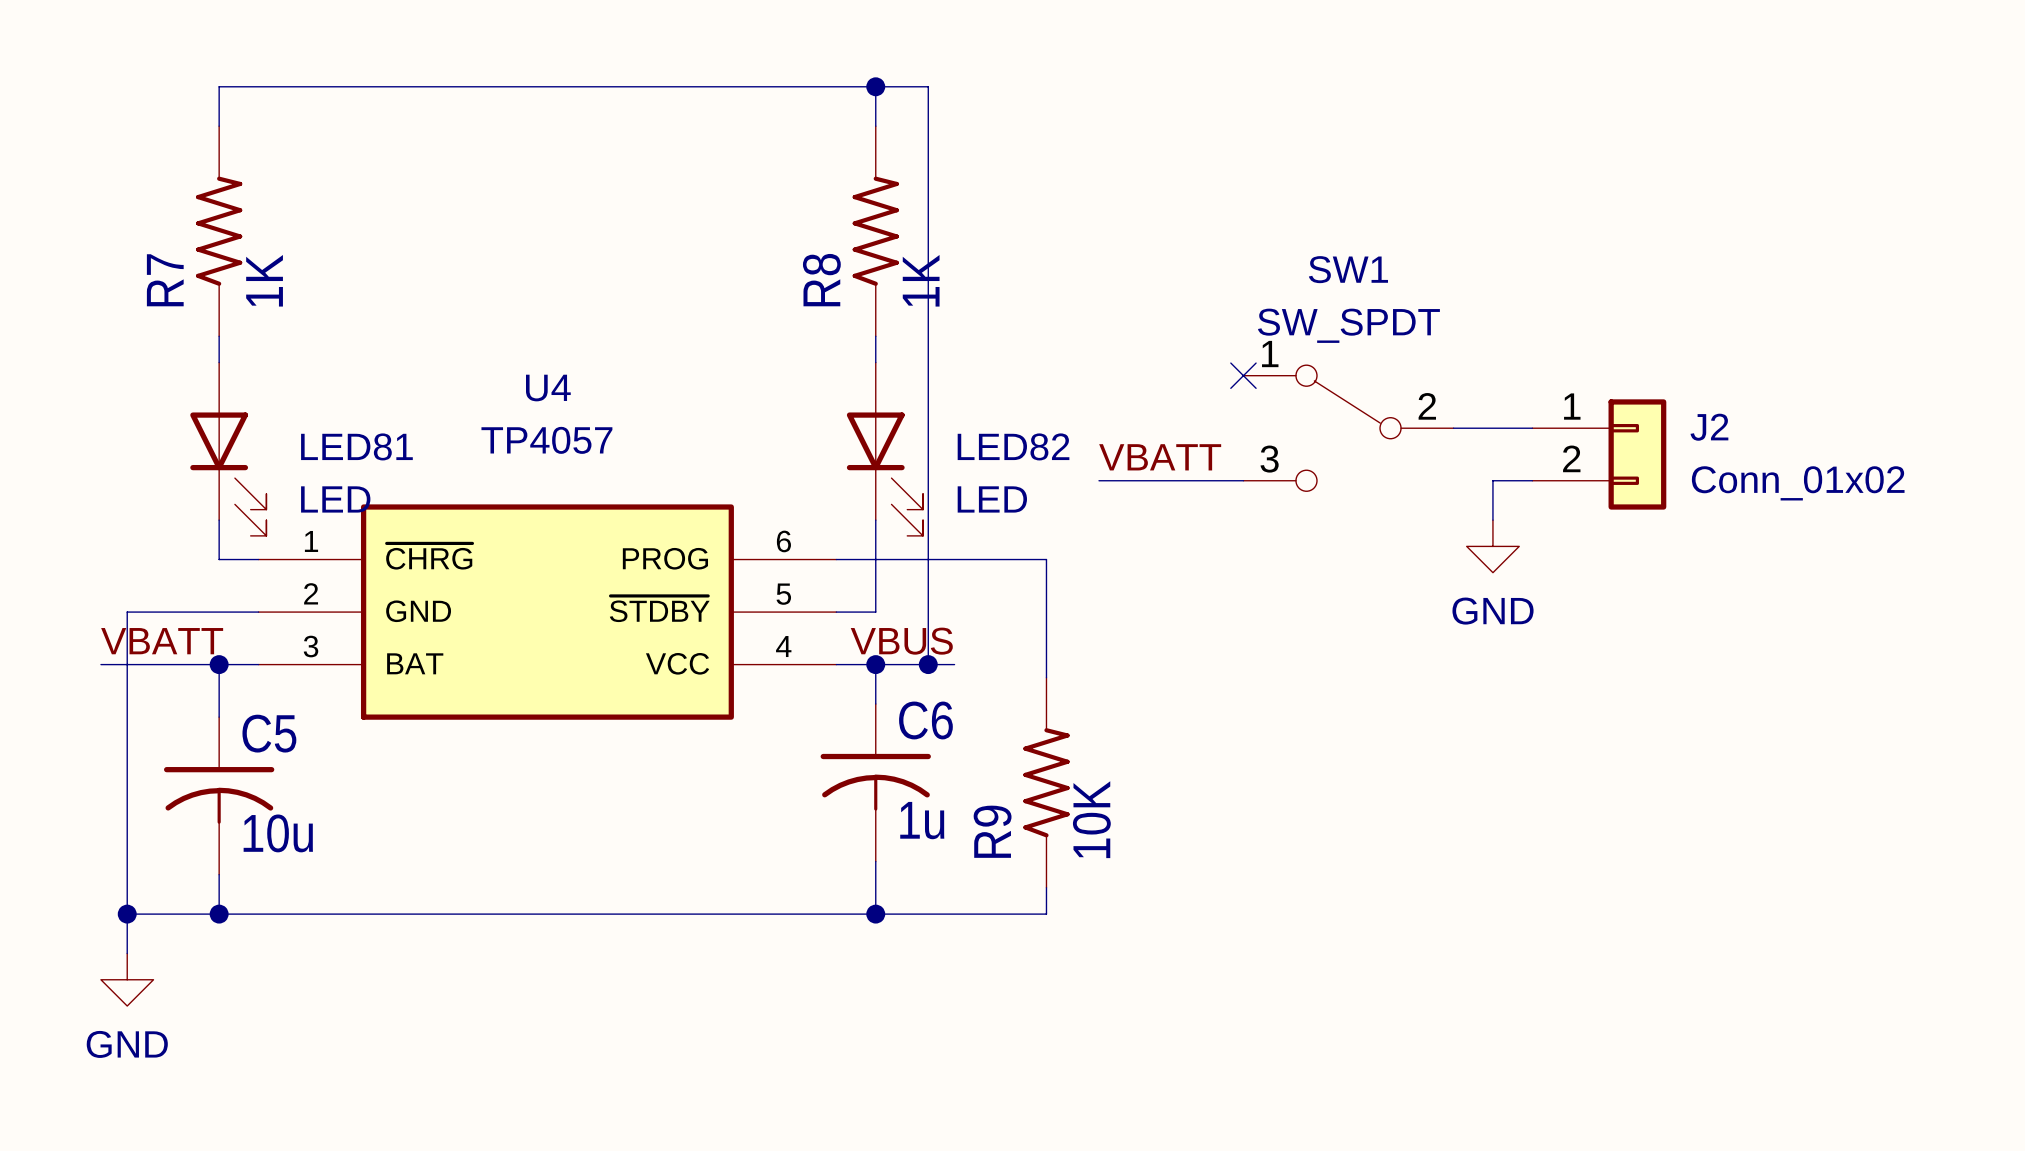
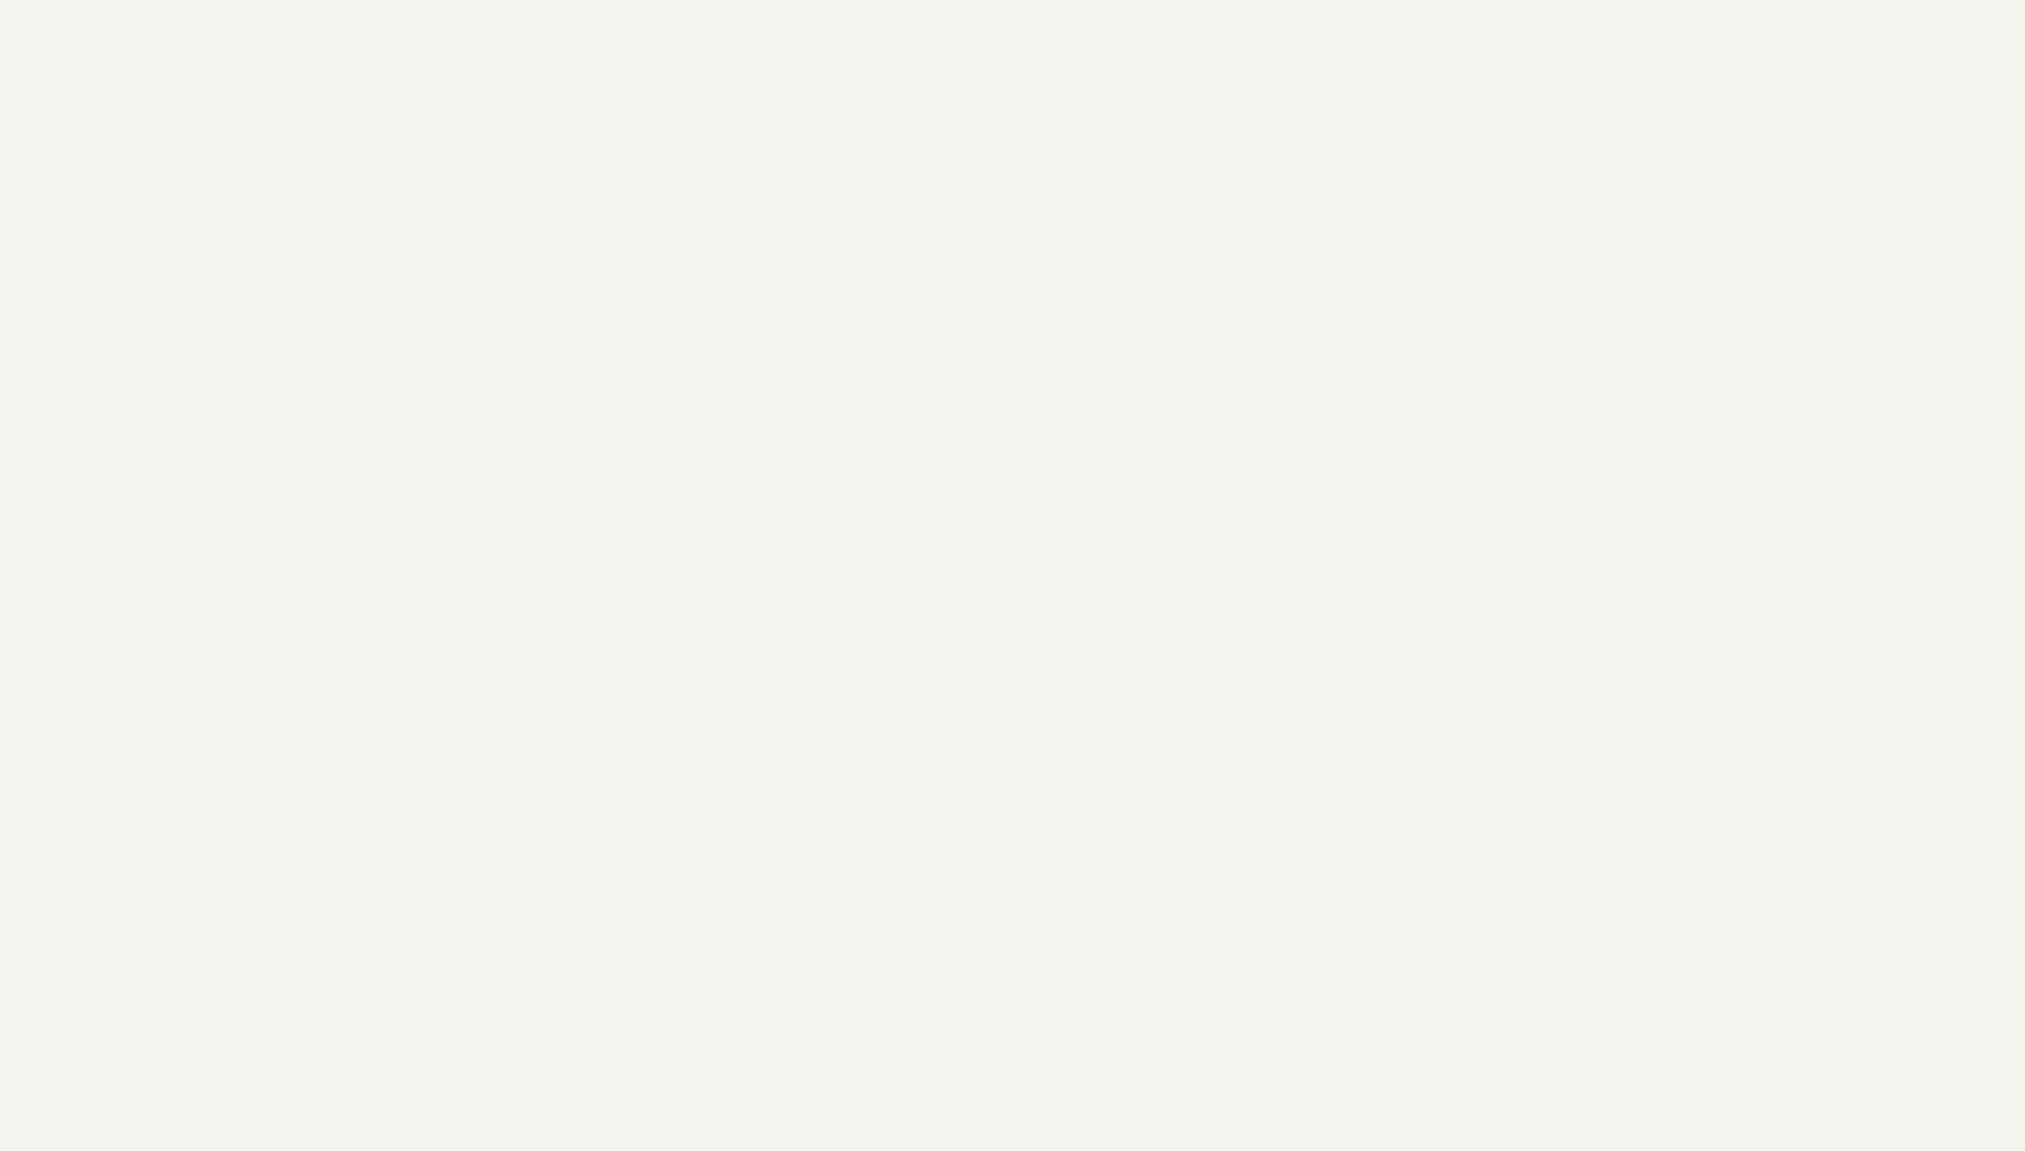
wire: (875, 86) (875, 126) -> none
junction: (875, 86) -> none
wire: (219, 126) (219, 86) (928, 86) (928, 664) -> none
R7: 1K (219, 231) -> none
R8: 1K (875, 231) -> none
wire: (219, 336) (219, 362) -> none
wire: (875, 336) (875, 362) -> none
no-connect mark: (1243, 375) -> none
SW1: SW_SPDT (1348, 428) -> none
wire: (1453, 428) (1532, 428) -> none
LED81: LED (228, 449) -> none
LED82: LED (884, 449) -> none
J2: Conn_01x02 (1599, 454) -> none
label: VBATT (1160, 457) -> none
wire: (1099, 480) (1243, 480) -> none
wire: (1532, 480) (1492, 480) (1492, 520) -> none
wire: (219, 520) (219, 559) (258, 559) -> none
wire: (875, 520) (875, 612) (836, 612) -> none
power symbol: GND (1492, 546) -> none
wire: (836, 559) (1046, 559) (1046, 677) -> none
wire: (258, 612) (127, 612) (127, 953) -> none
U4: TP4057 (547, 612) -> none
label: VBATT (162, 641) -> none
label: VBUS (901, 641) -> none
wire: (100, 664) (258, 664) -> none
wire: (219, 664) (219, 717) -> none
junction: (219, 664) -> none
wire: (836, 664) (954, 664) -> none
wire: (875, 664) (875, 703) -> none
junction: (875, 664) -> none
junction: (928, 664) -> none
C6: 1u (875, 782) -> none
R9: 10K (1046, 782) -> none
C5: 10u (219, 795) -> none
wire: (875, 861) (875, 914) -> none
wire: (219, 874) (219, 914) -> none
wire: (1046, 887) (1046, 914) (127, 914) -> none
junction: (127, 914) -> none
junction: (219, 914) -> none
junction: (875, 914) -> none
power symbol: GND (127, 979) -> none

